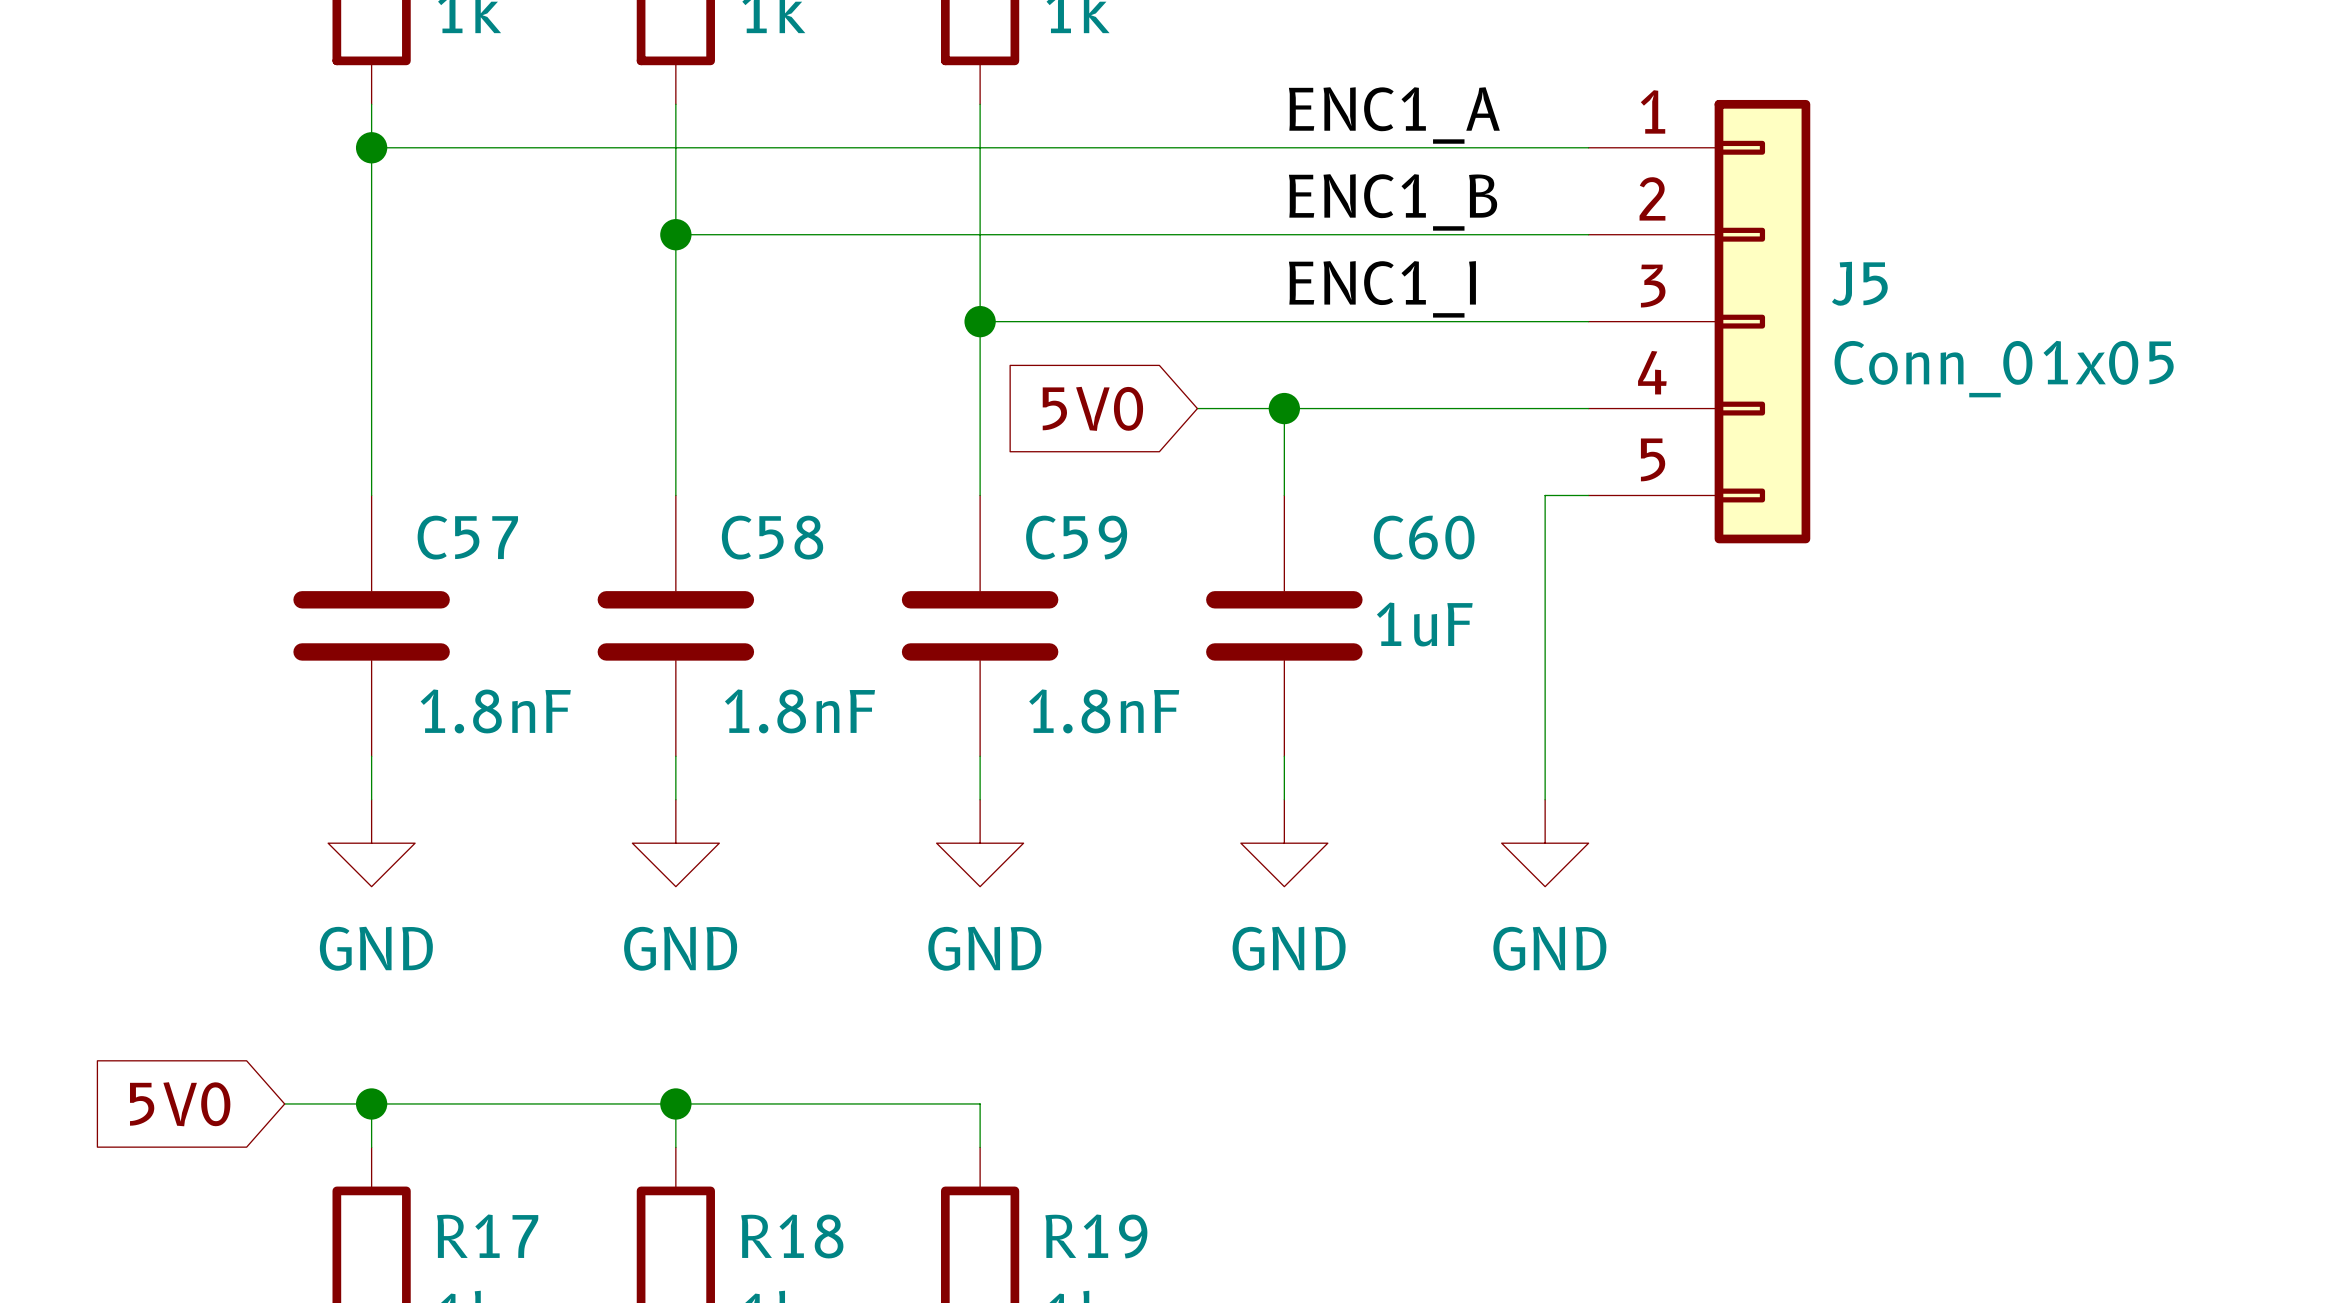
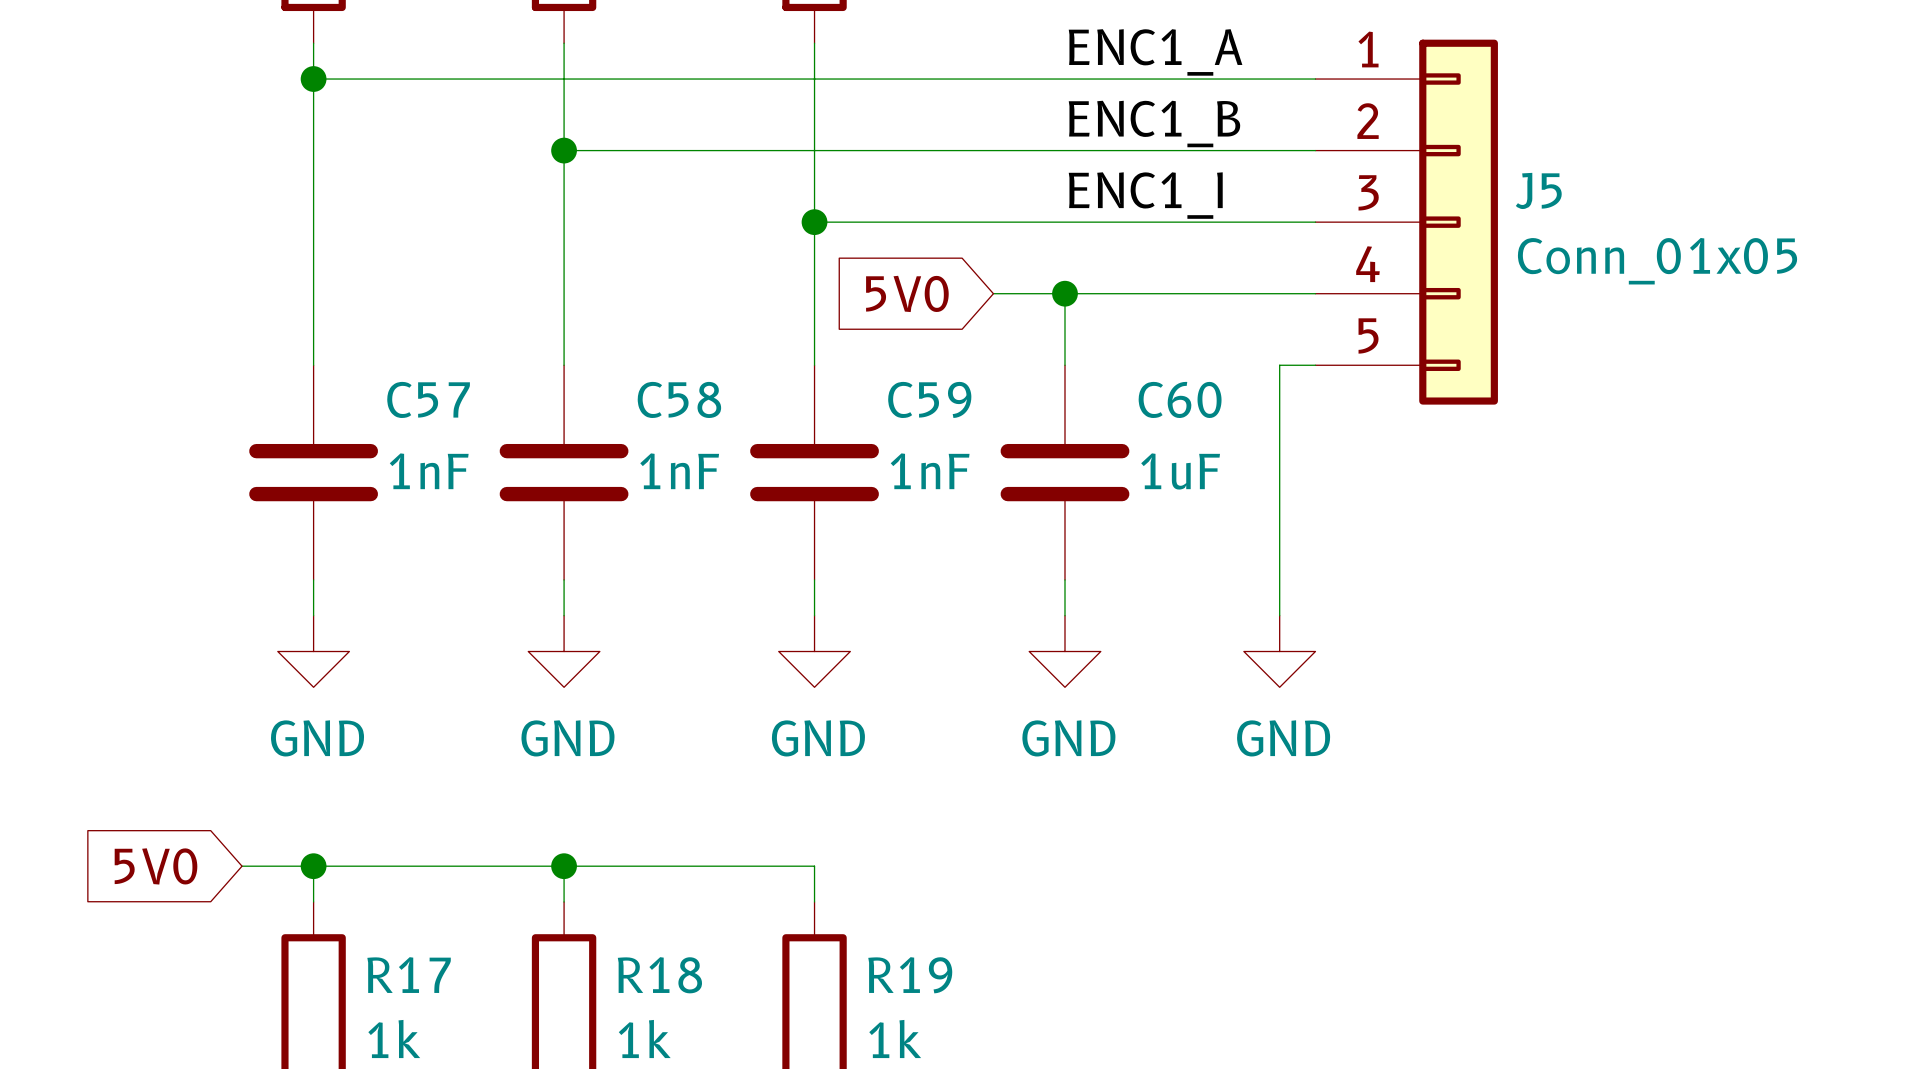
C57 name position: C57 (467, 537) -> C57 (428, 399)
C58 name position: C58 (772, 537) -> C58 (679, 399)
C59 name position: C59 (1076, 537) -> C59 (929, 399)
C57 value: 1.8nF (495, 711) -> 1nF (429, 471)
C58 value: 1.8nF (799, 711) -> 1nF (679, 471)
C59 value: 1.8nF (1104, 711) -> 1nF (930, 471)

